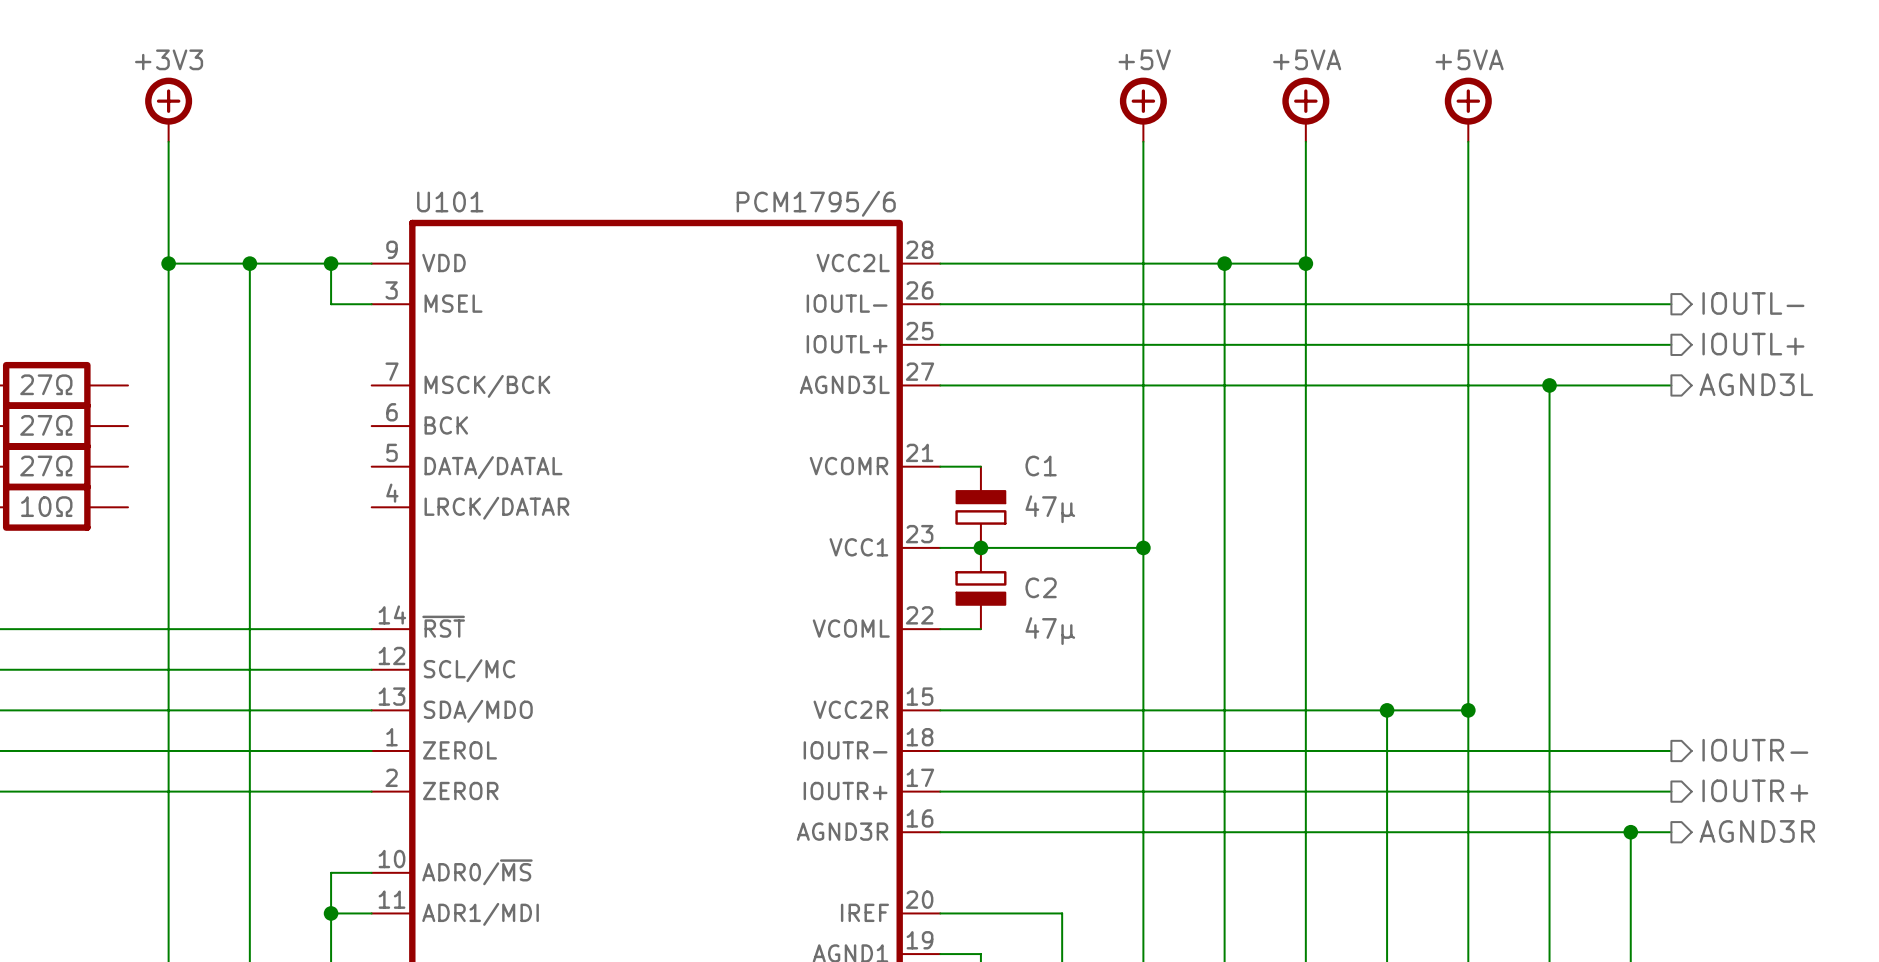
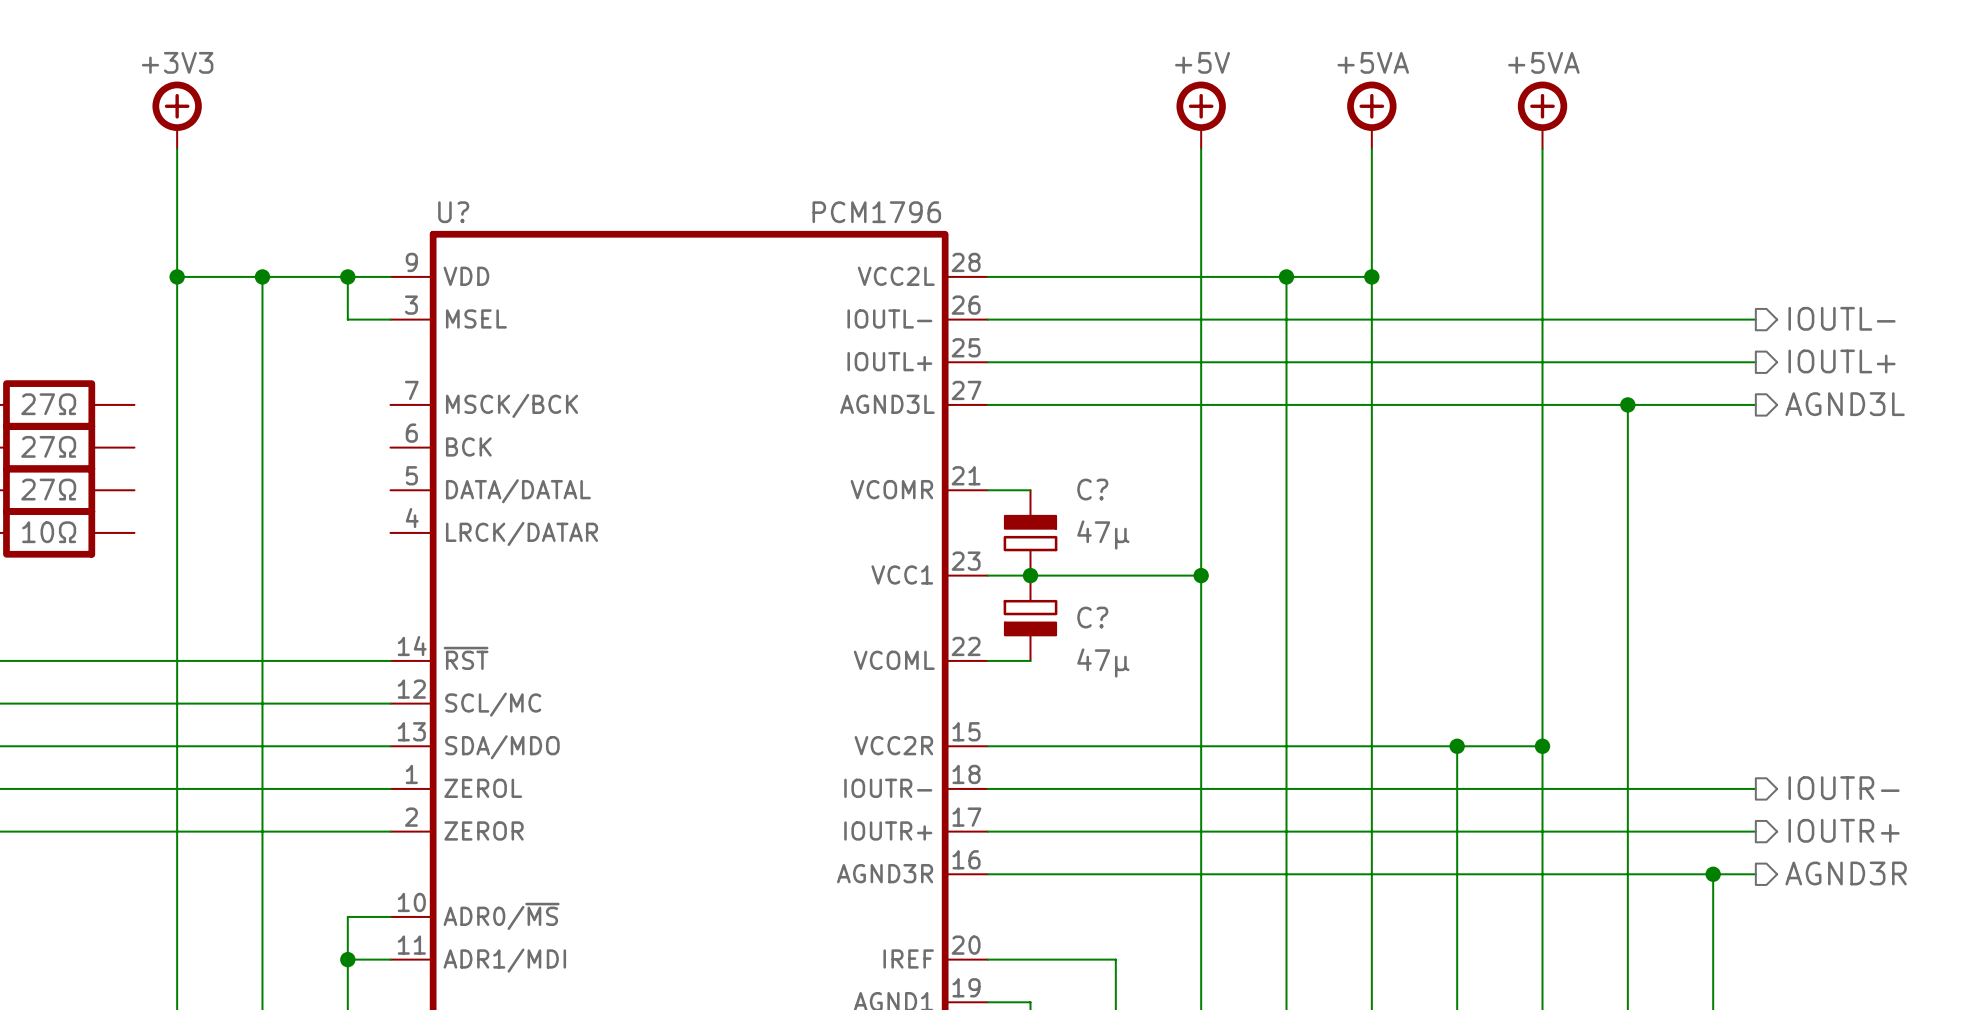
U101 name: U101 (450, 202) -> U? (453, 212)
U101 value: PCM1795/6 (816, 203) -> PCM1796 (876, 212)
C1 name: C1 (1041, 466) -> C? (1092, 489)
C2 name: C2 (1041, 587) -> C? (1092, 617)

